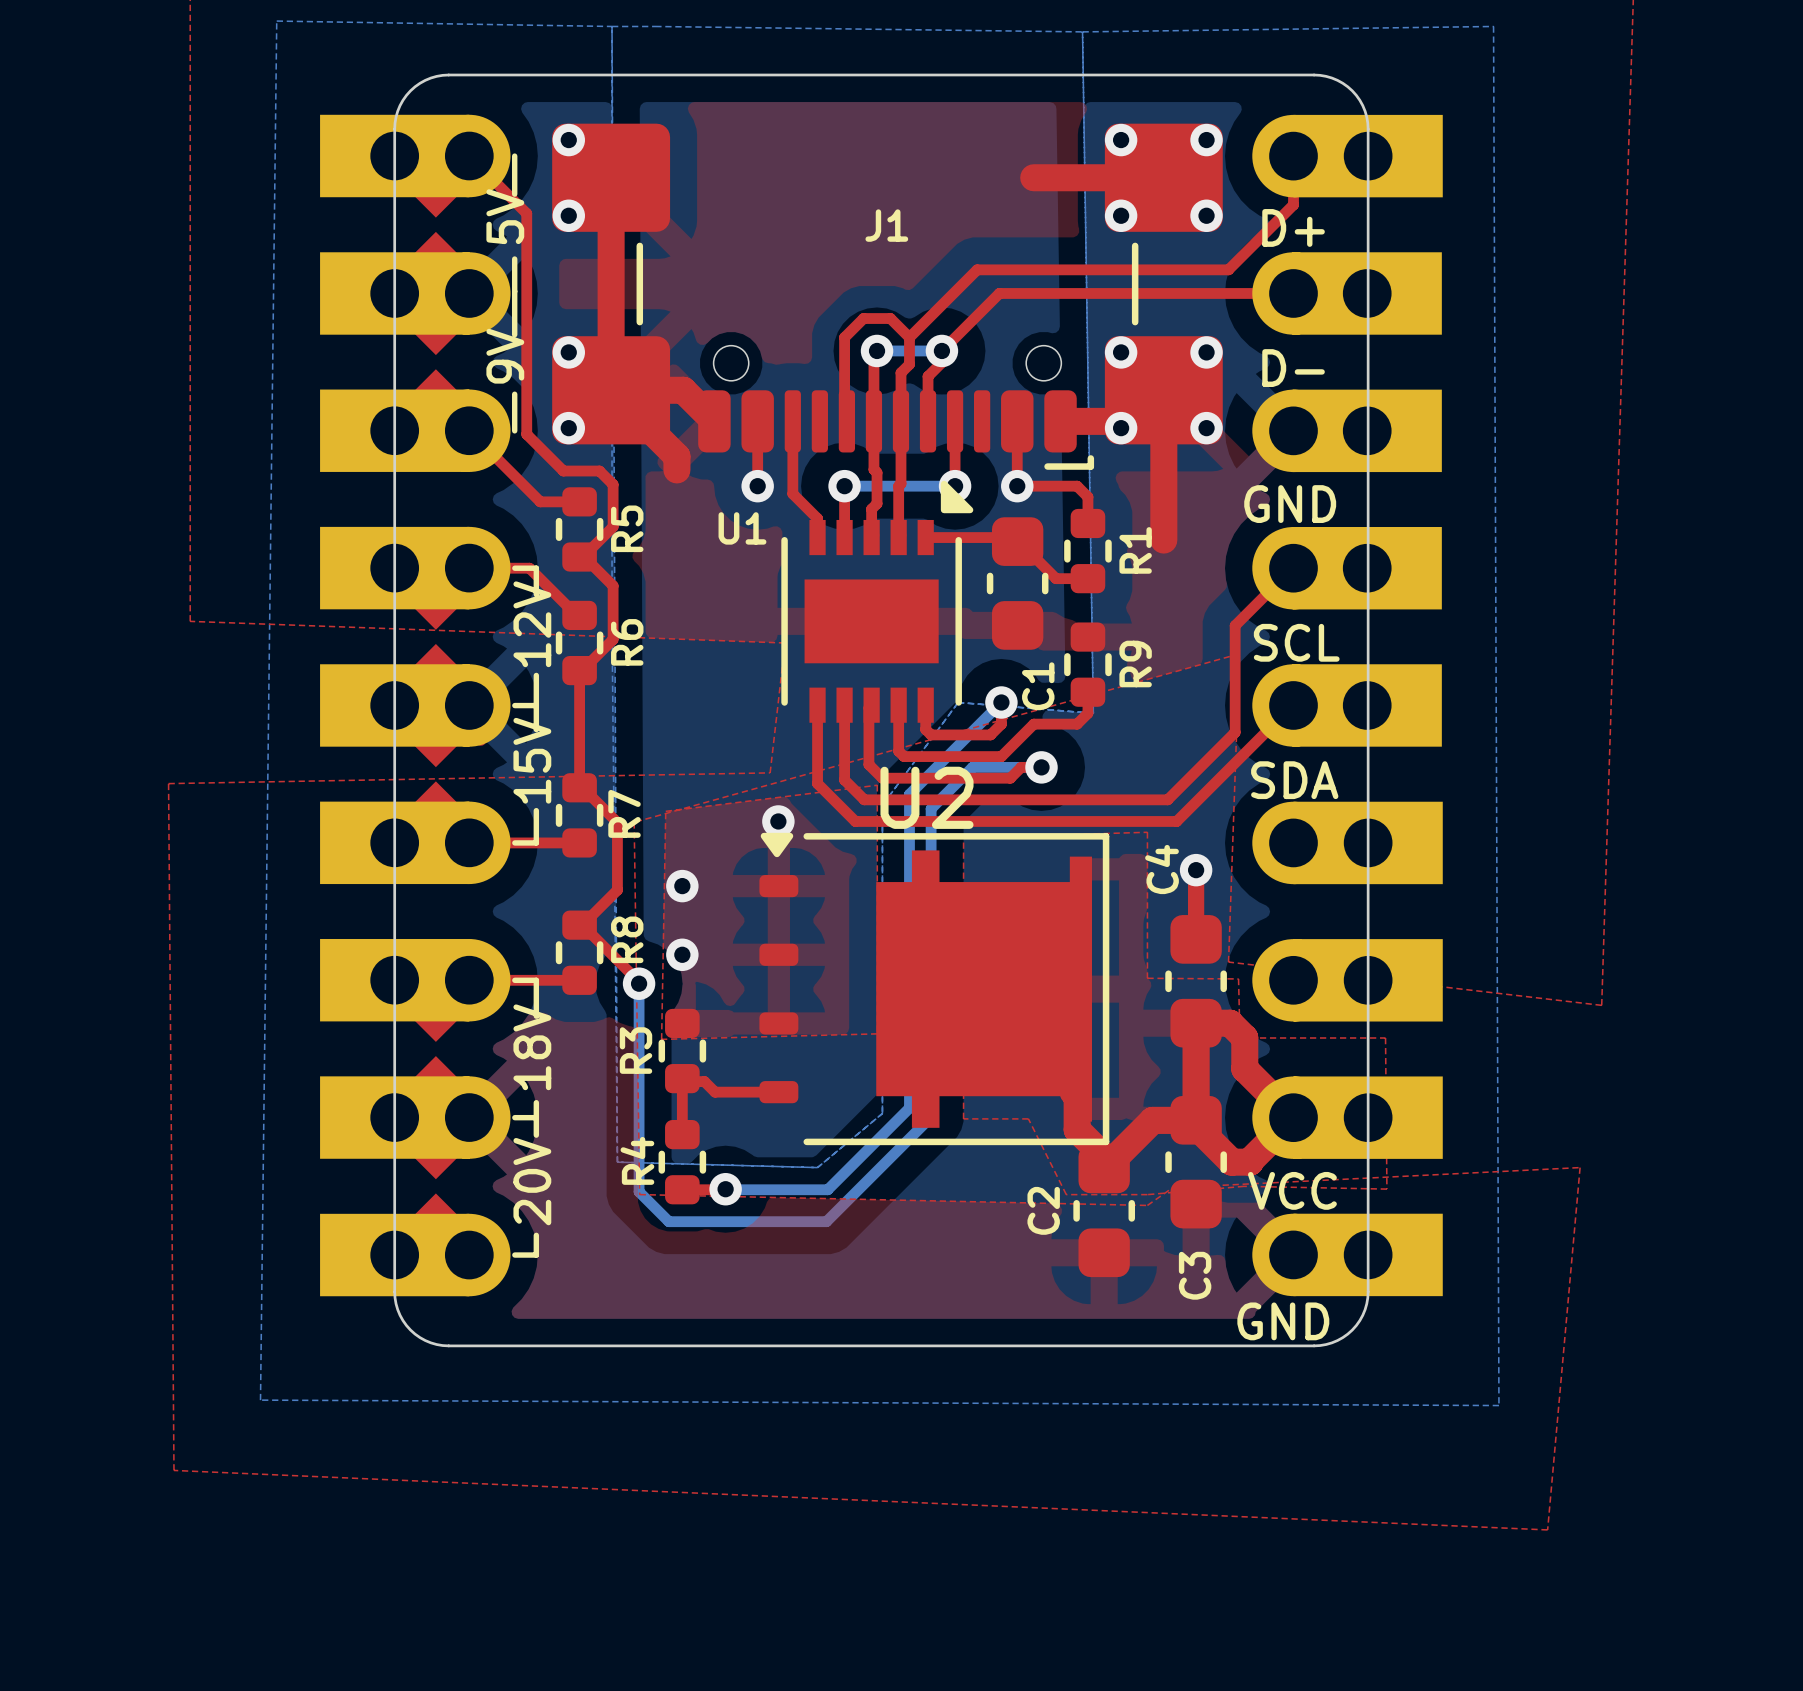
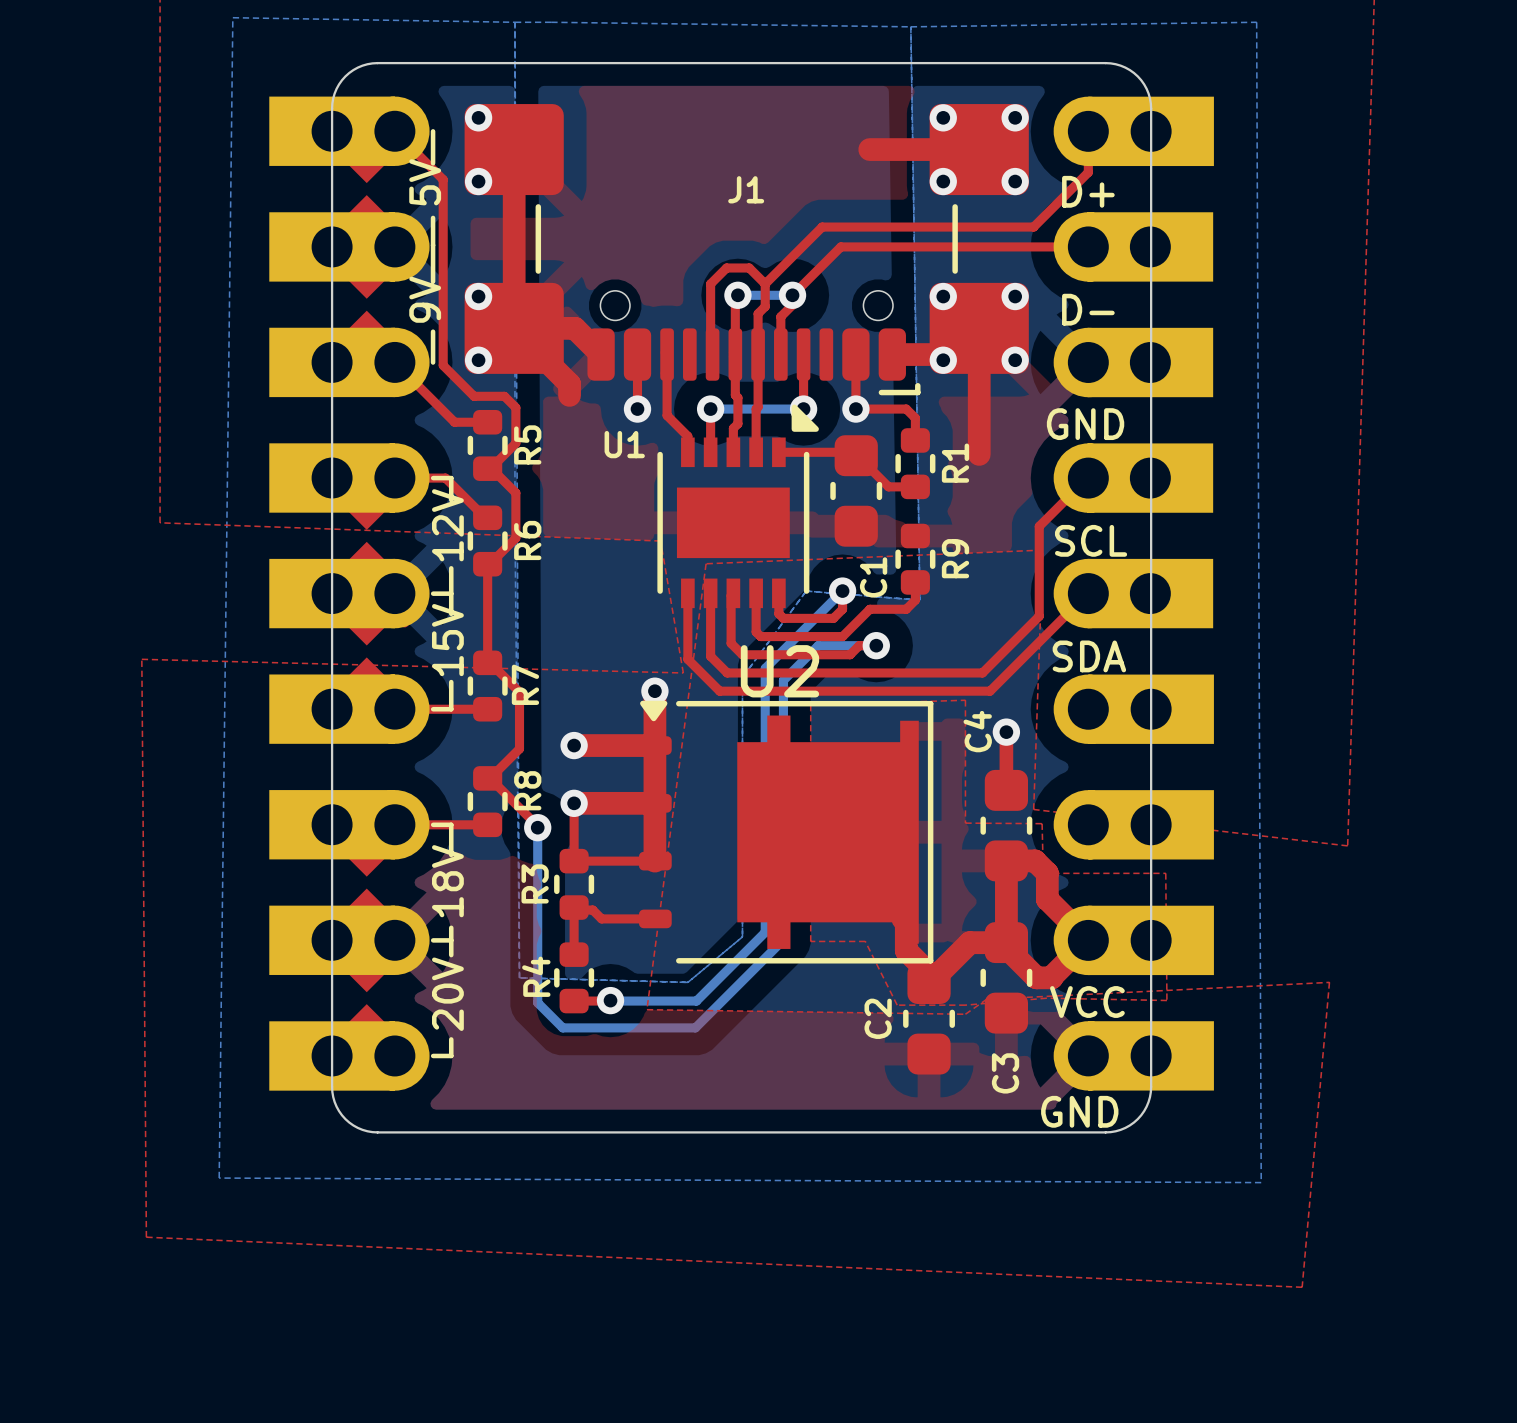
top zone outline: (785, 643) (770, 772) (168, 783) -> (660, 541) (683, 672) (141, 659)
top zone outline: (1239, 653) (634, 822) (639, 1194) (1147, 1205) -> (1042, 550) (706, 563) (646, 1009) (965, 1014)
top zone outline: (877, 785) (665, 811) (661, 1039) (877, 1033) (877, 785) -> none
top track: none -> (654, 691) (654, 861) (574, 861) (574, 803) (654, 803)
top track: none -> (574, 745) (654, 745)

